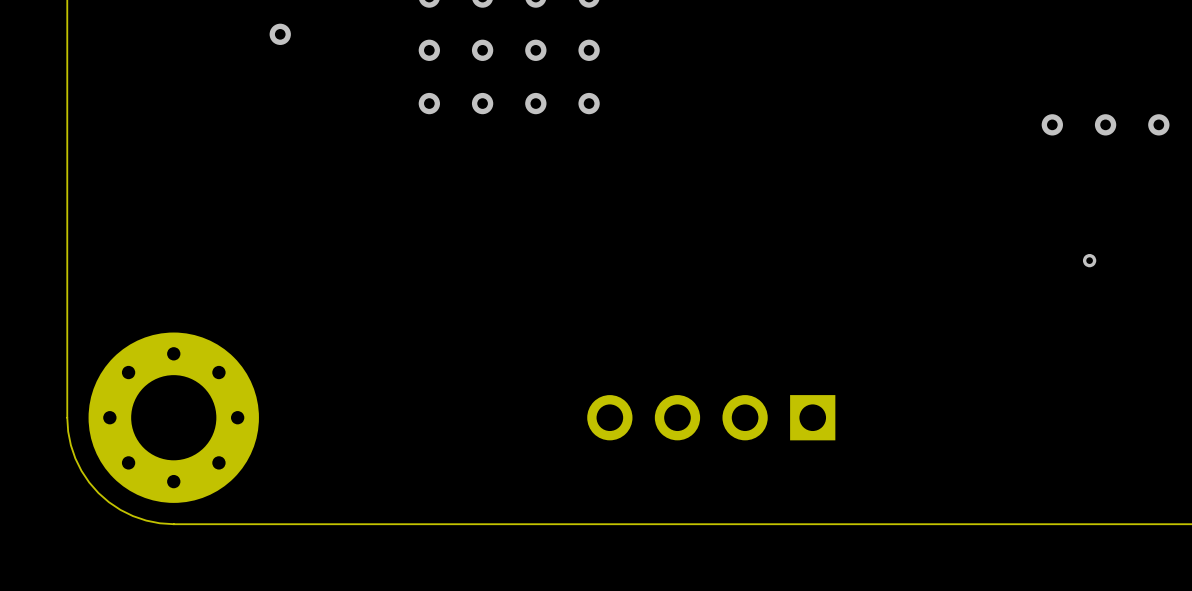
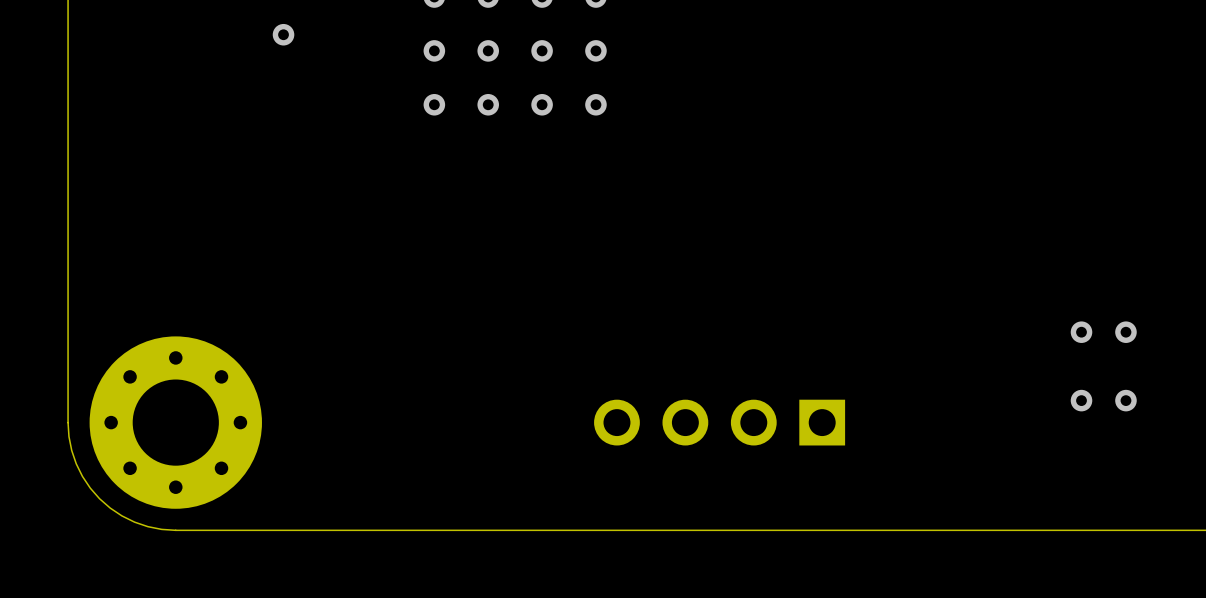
via: (1052, 124) -> none
via: (1105, 124) -> none
via: (1158, 124) -> none
via: (1089, 260) -> none
via: none -> (1081, 332)
via: none -> (1125, 332)
via: none -> (1081, 400)
via: none -> (1125, 400)

